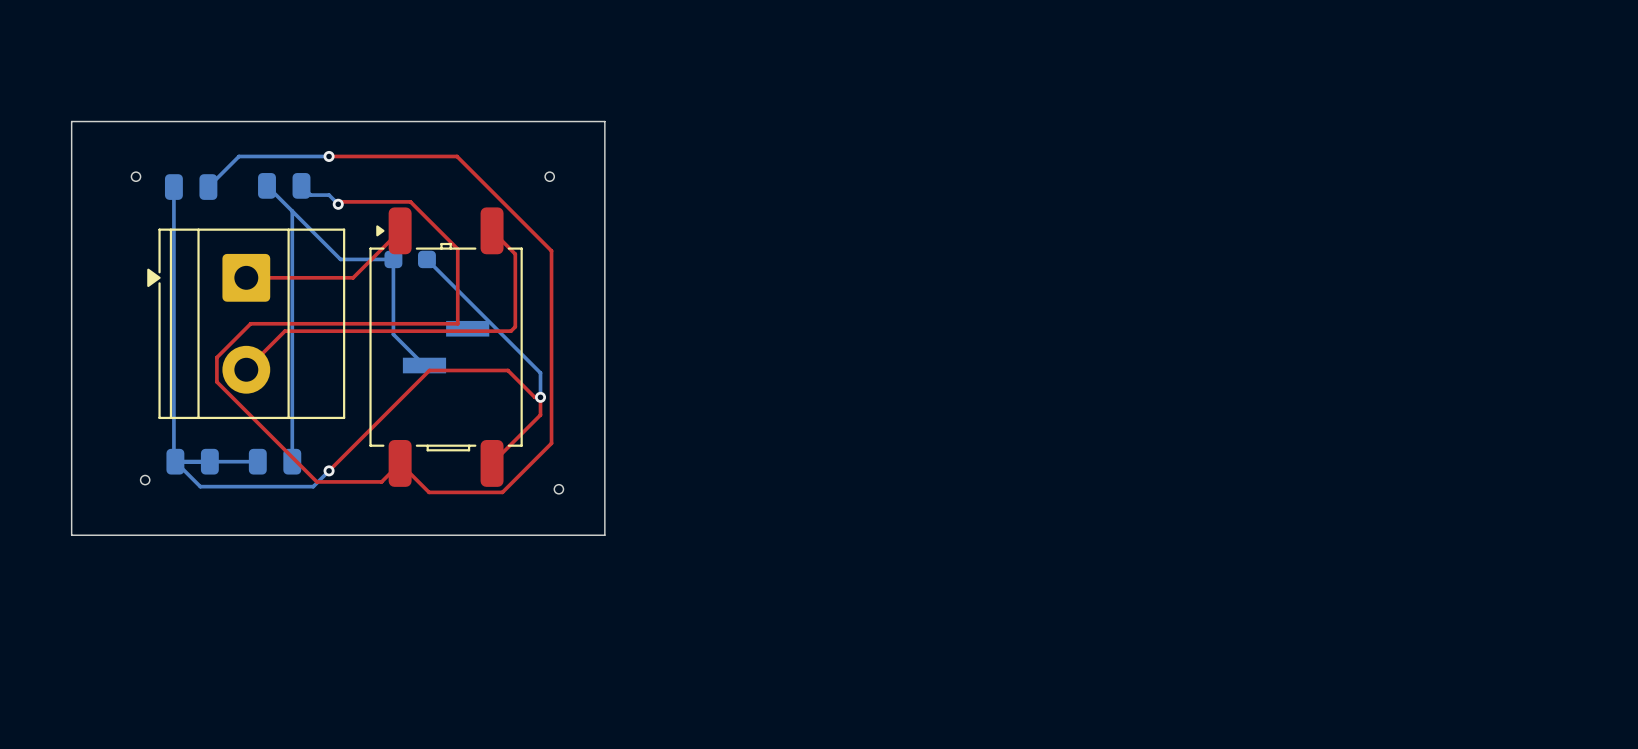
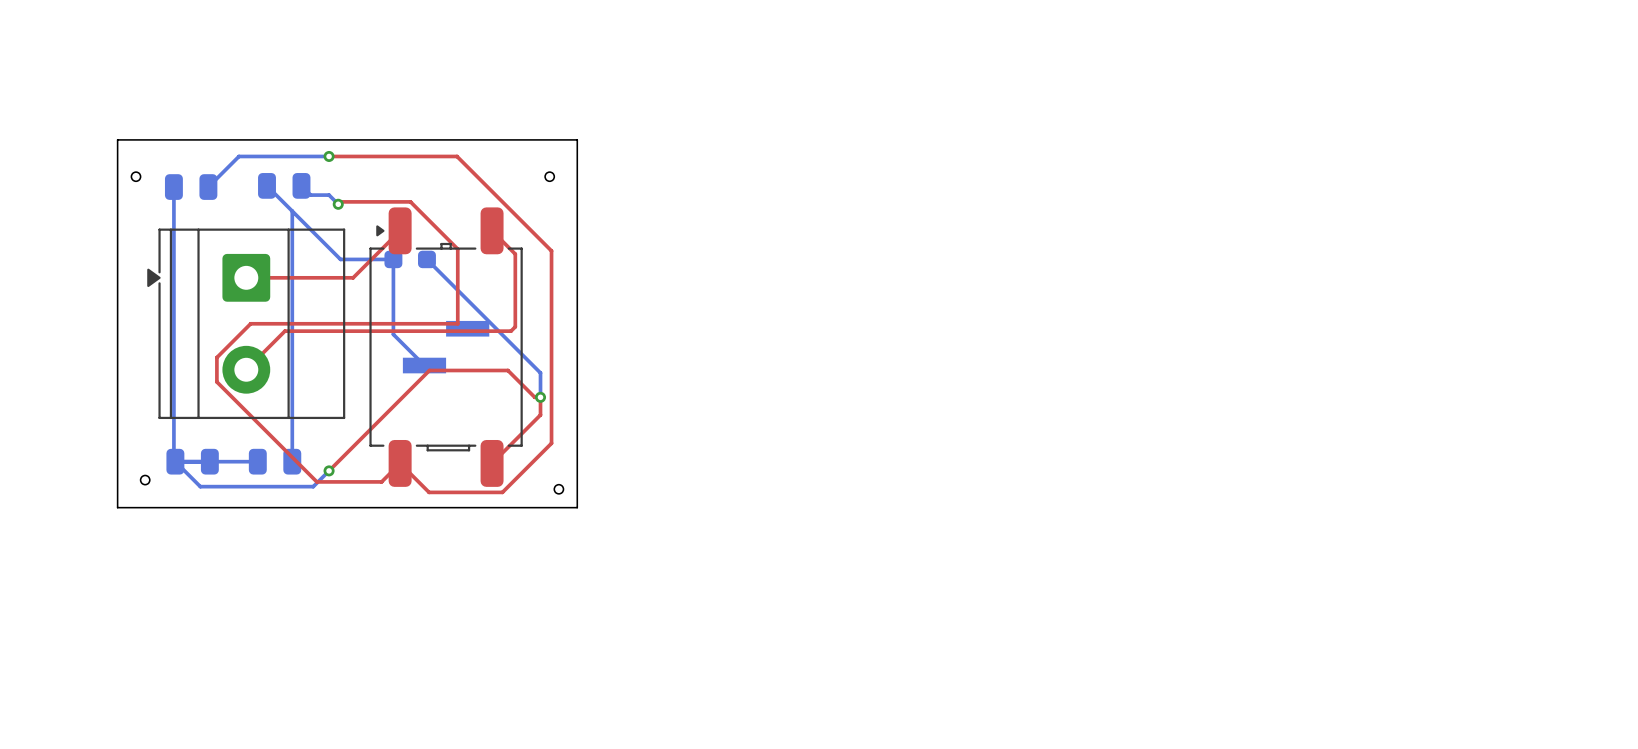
board edge: (71, 121) (604, 121) (604, 535) (71, 535) (71, 121) -> (117, 139) (117, 507) (577, 507) (577, 139) (117, 139)

